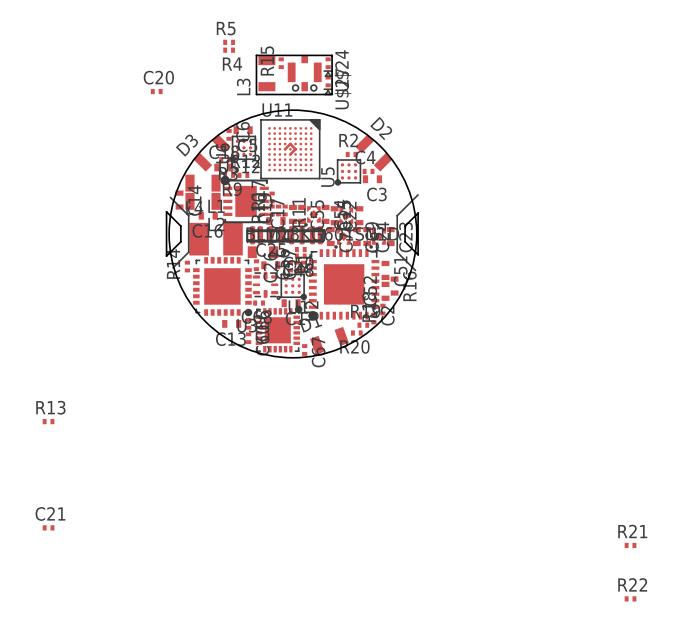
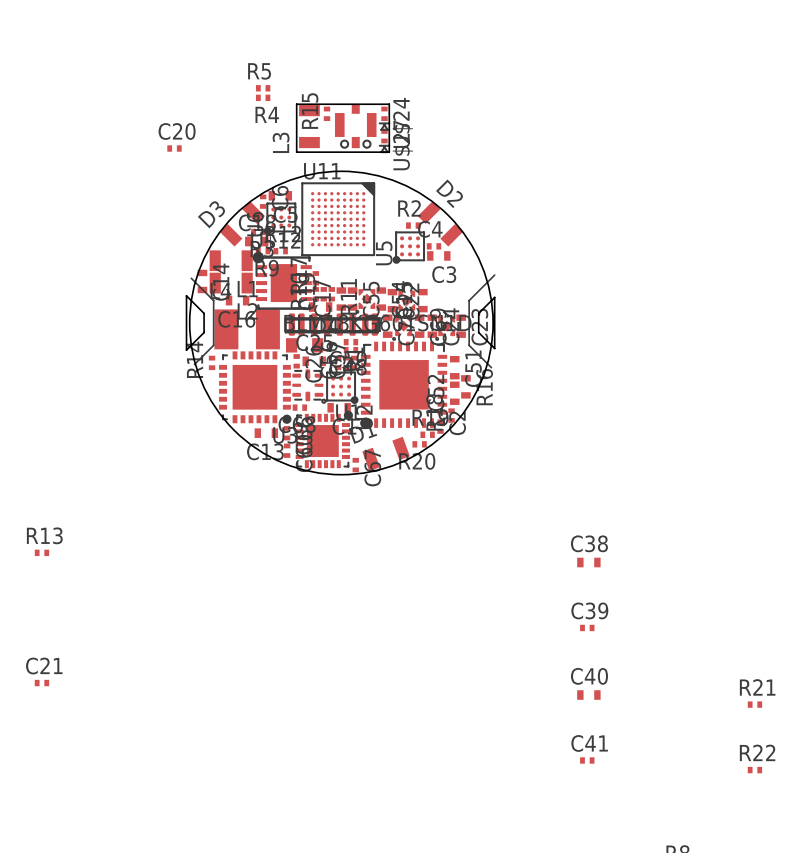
track: (285, 149) (290, 144) (295, 149) (290, 154) -> none
C38: none -> (588, 562)
C39: none -> (587, 627)
C40: none -> (588, 695)
C41: none -> (587, 760)

